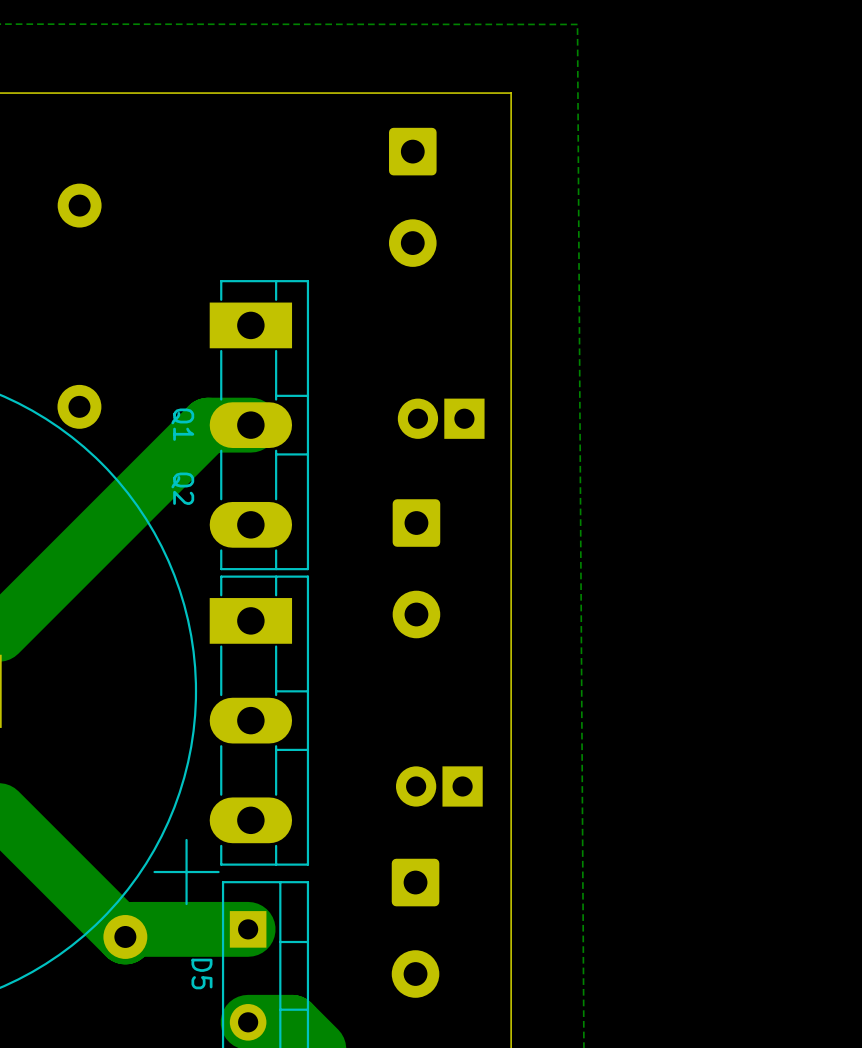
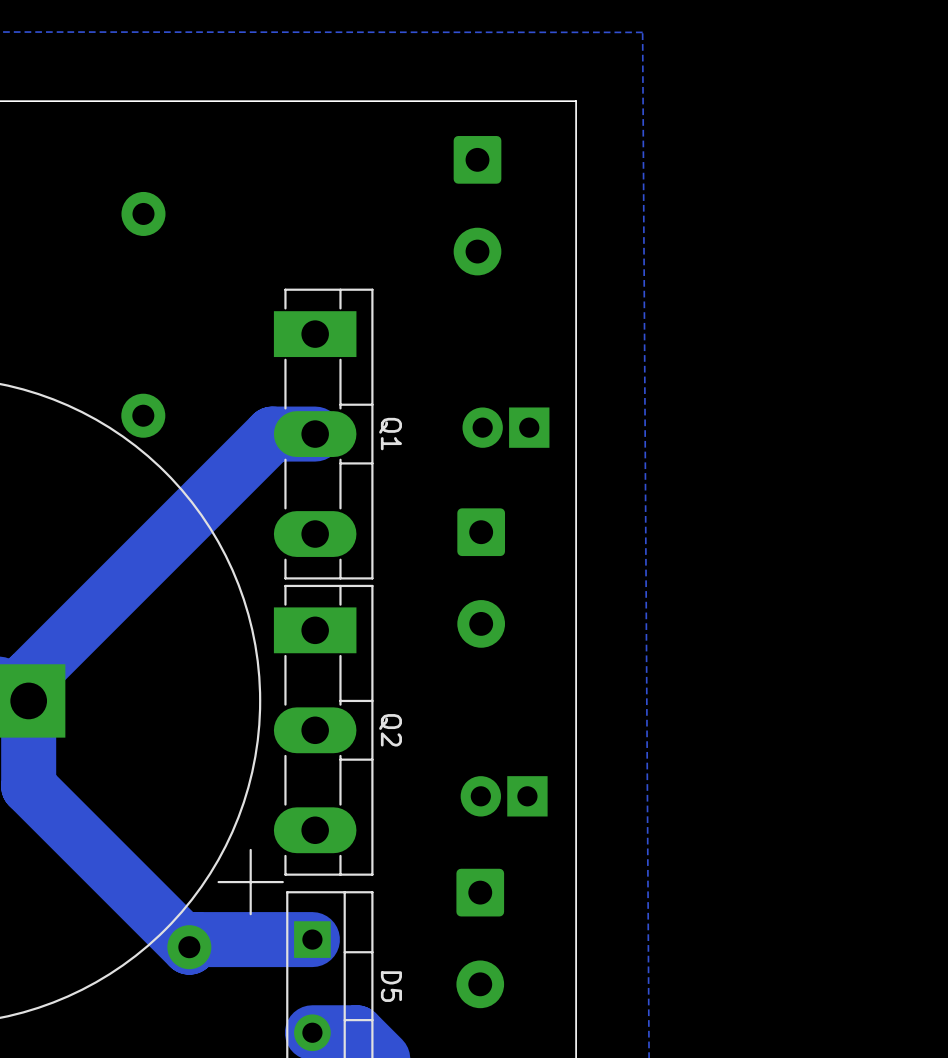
Q1 name position: Q1 (182, 424) -> Q1 (390, 434)
Q2 name position: Q2 (182, 488) -> Q2 (390, 730)
D5 name position: D5 (201, 973) -> D5 (391, 986)

